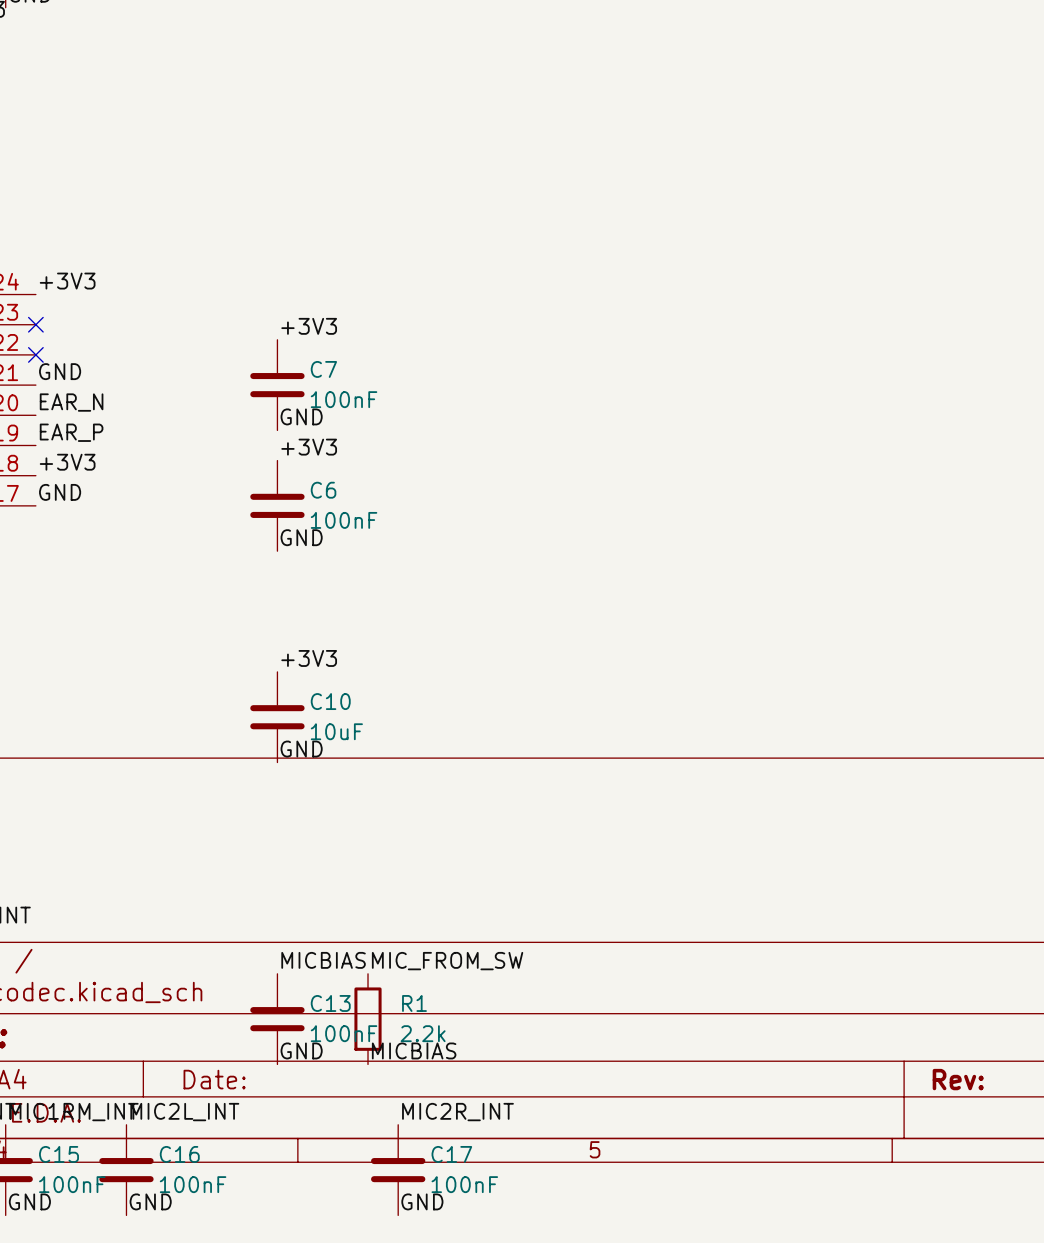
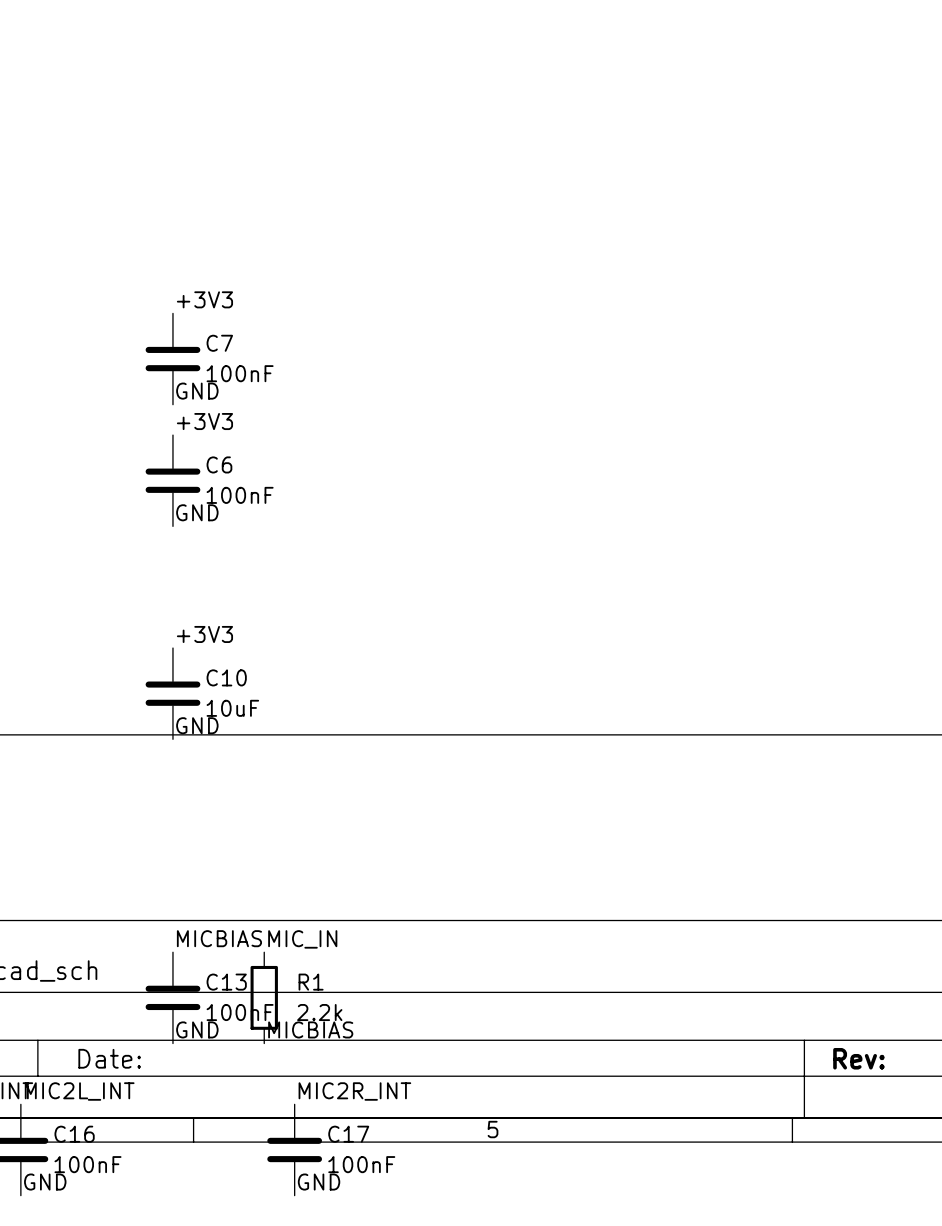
label: MIC_FROM_SW (447, 961) -> MIC_IN (302, 939)

